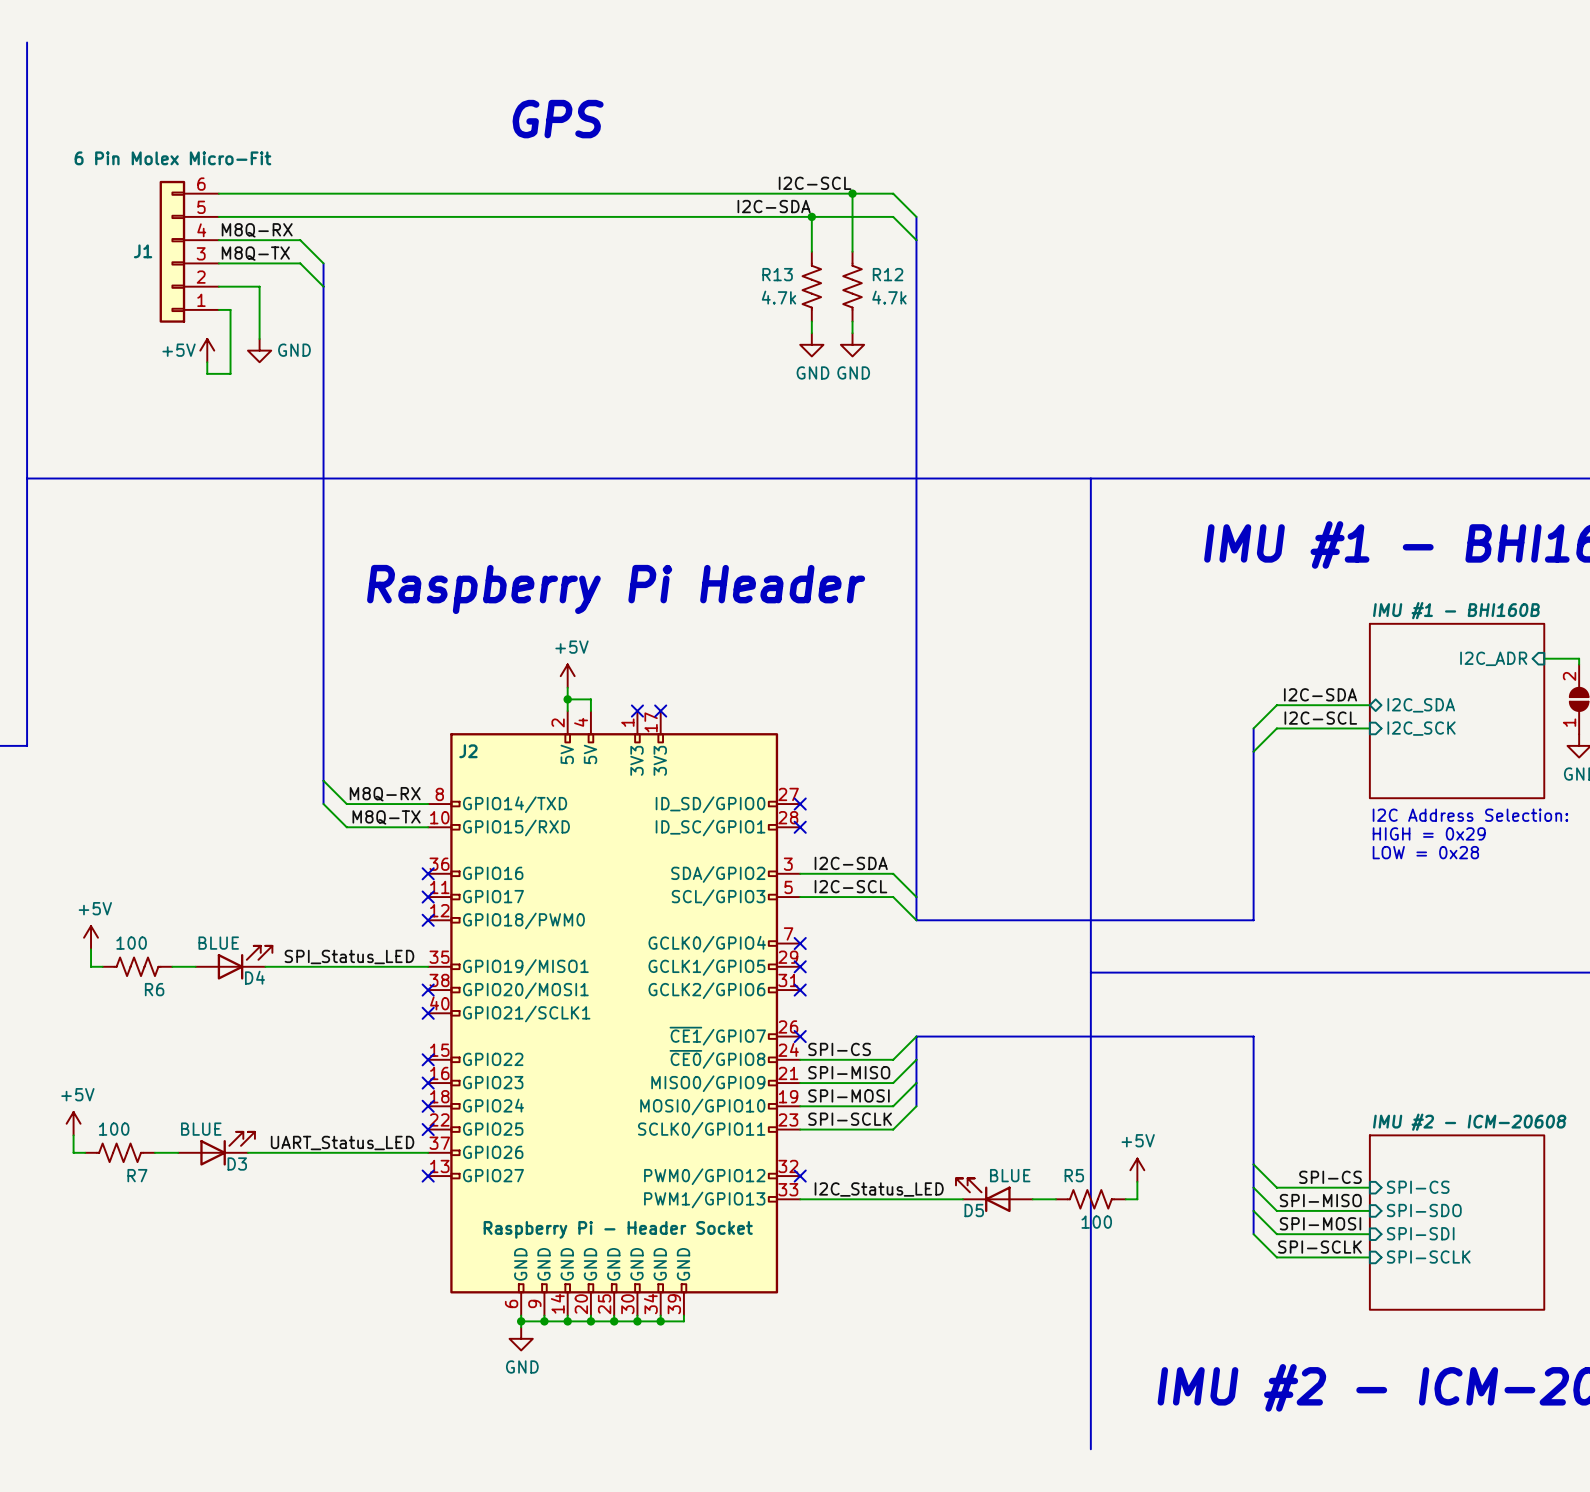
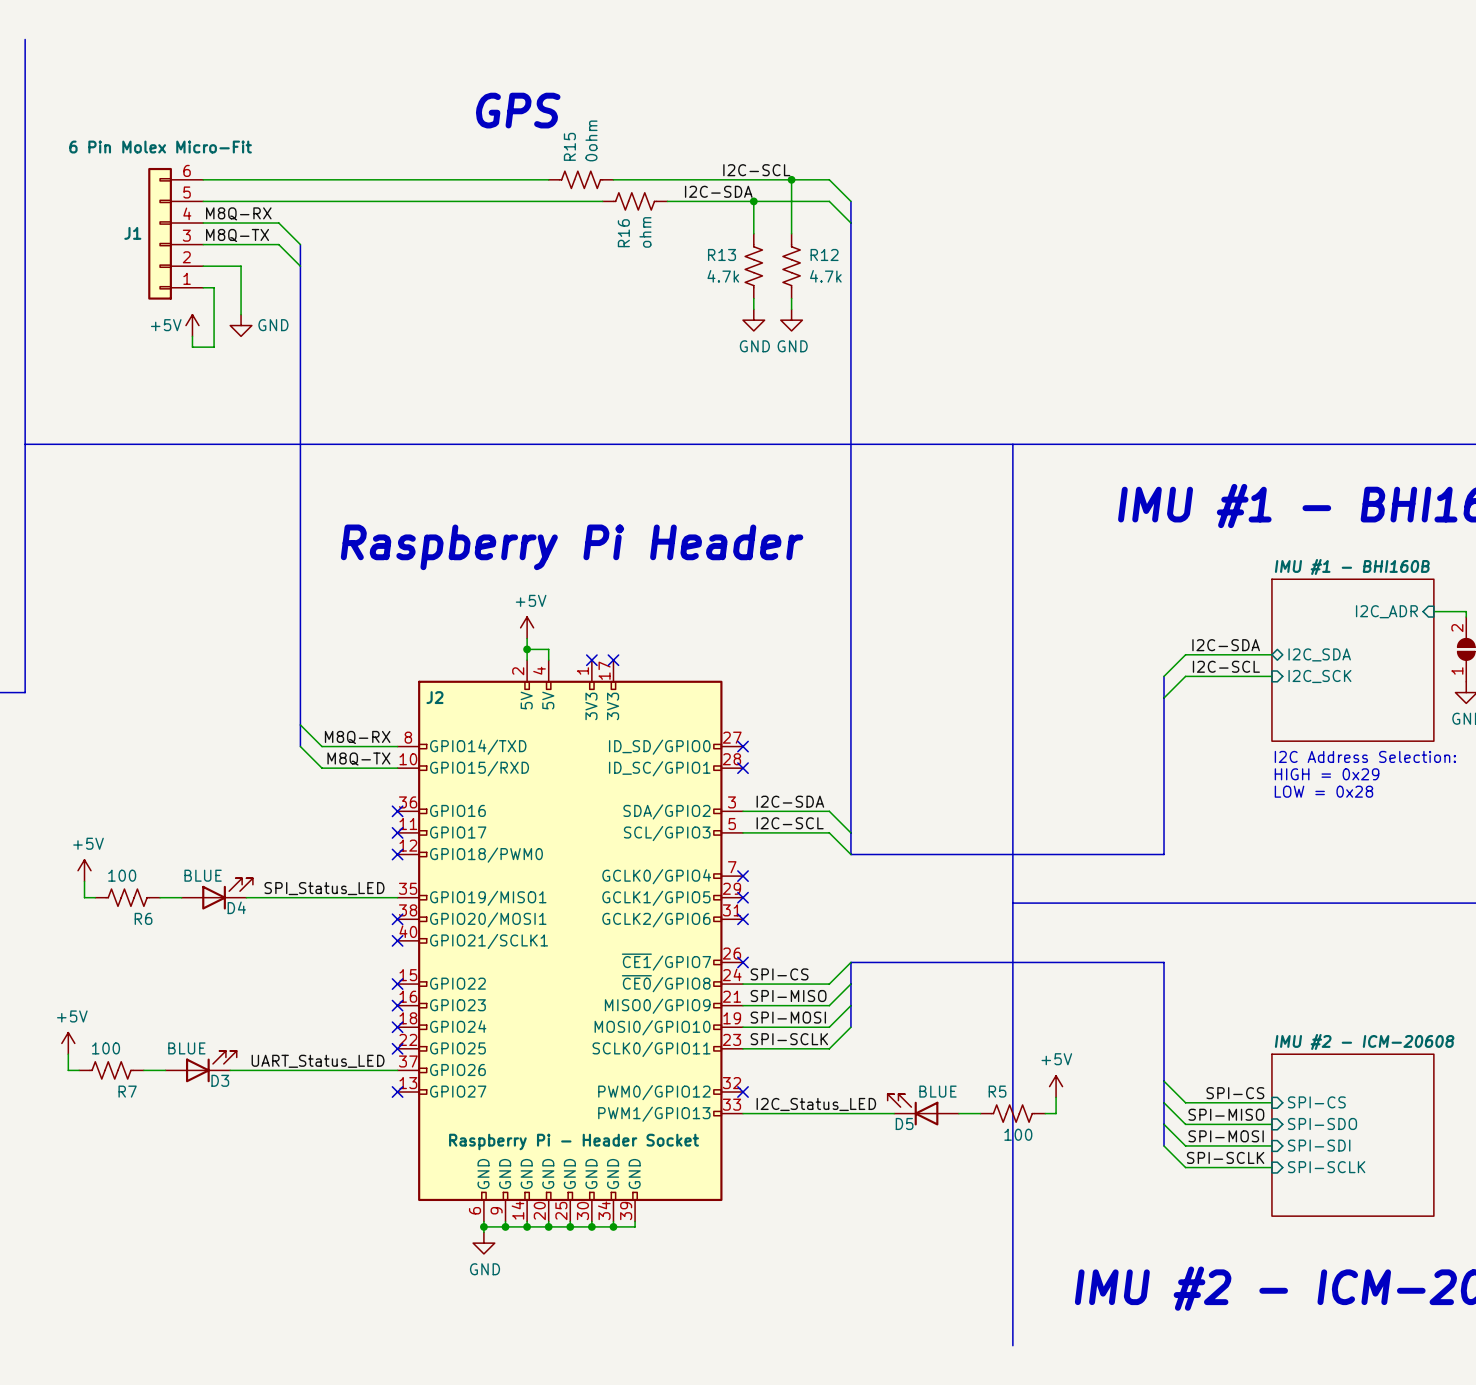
R15: none -> 0ohm (581, 179)
R16: none -> ohm (635, 201)

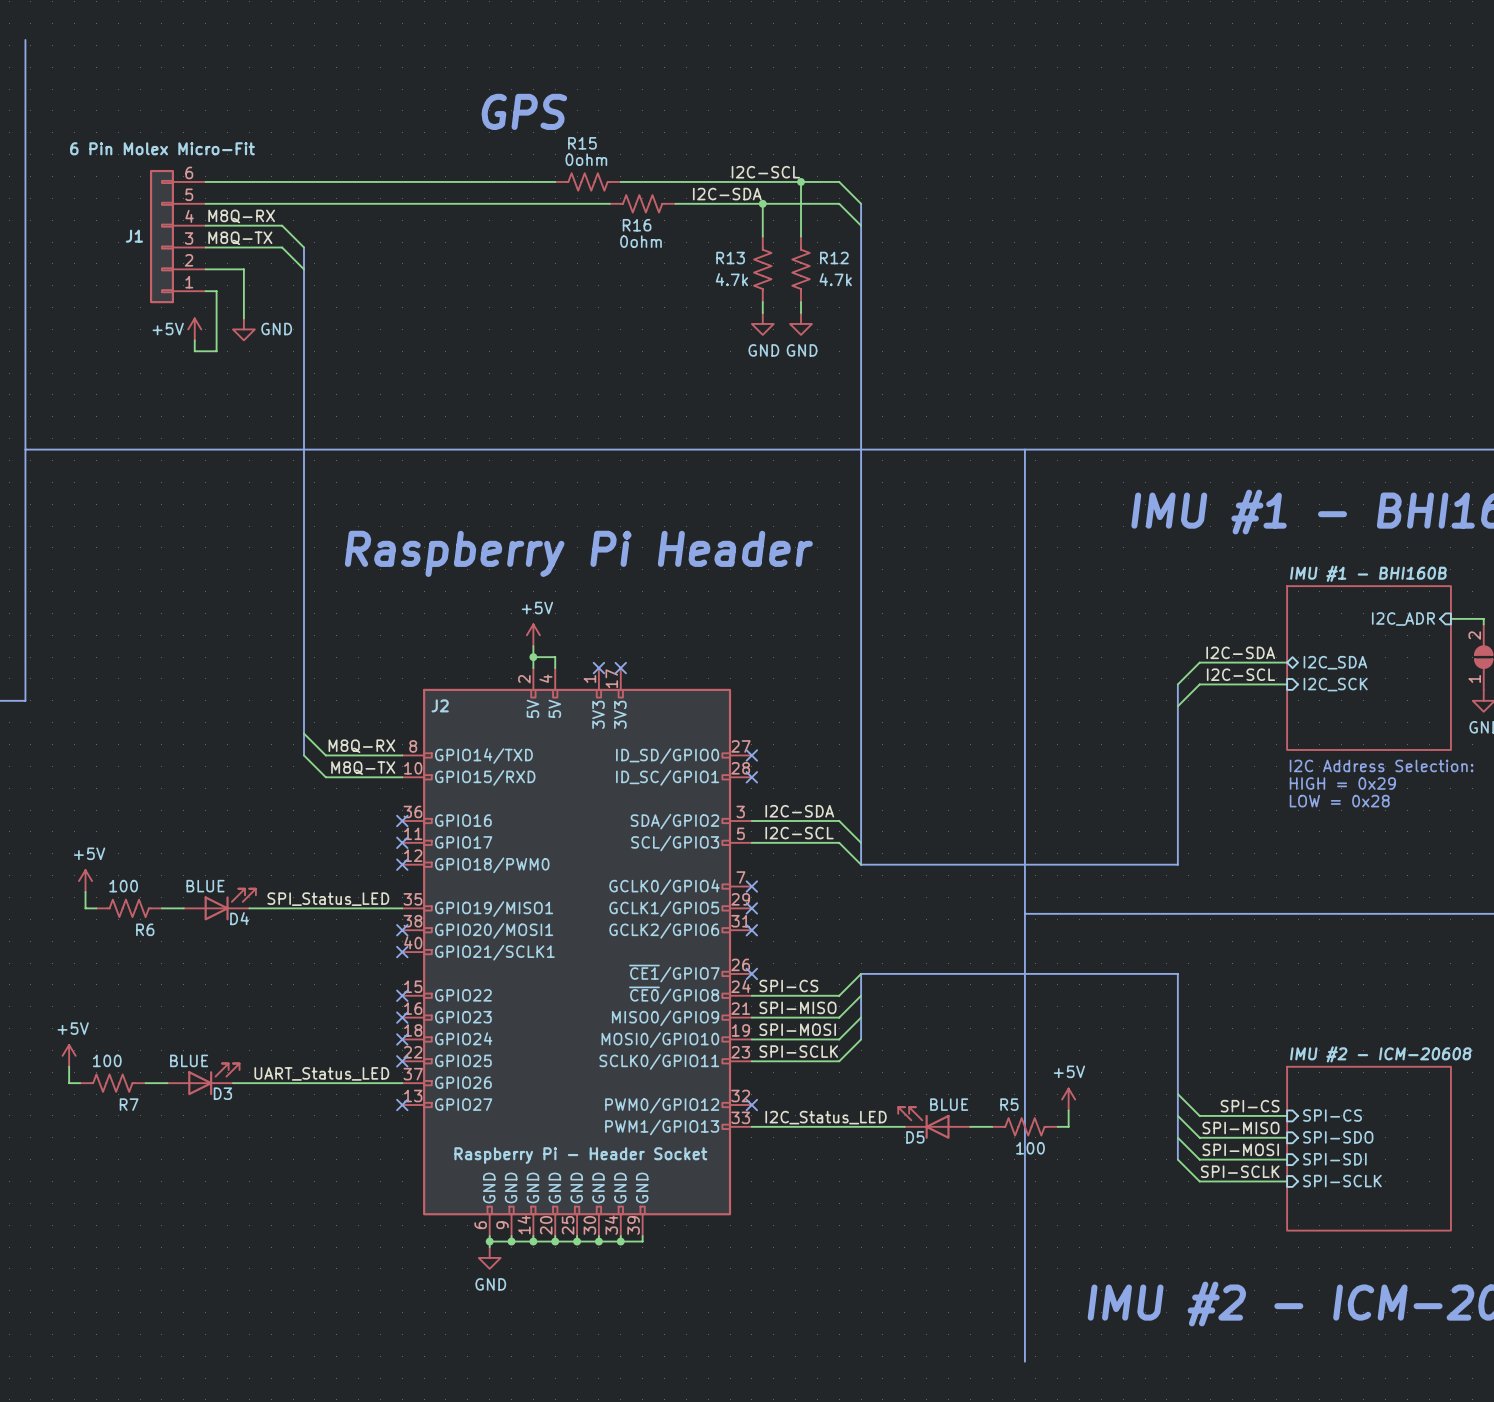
R15 value rotation: 0° (591, 140) -> 90° clockwise (586, 159)
R15 name rotation: 0° (569, 146) -> 90° clockwise (582, 143)
R16 value: ohm (645, 232) -> 0ohm (640, 241)
R16 name rotation: 0° (623, 233) -> 90° clockwise (637, 225)

